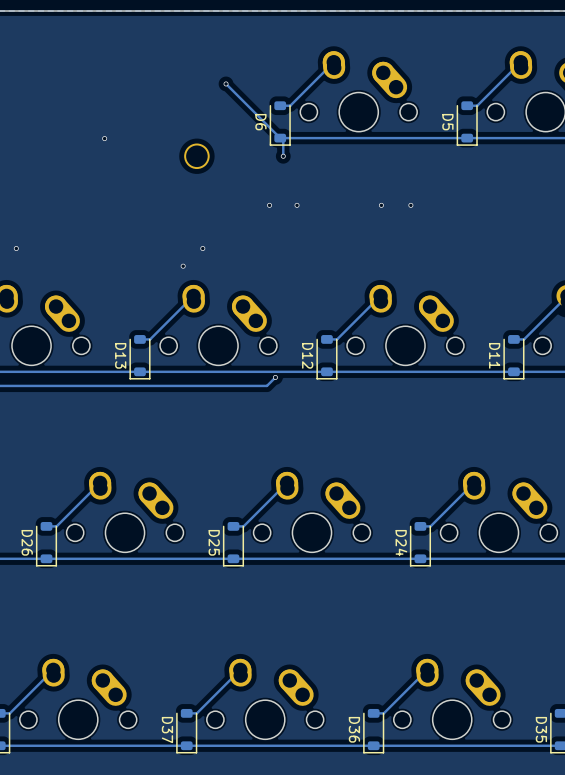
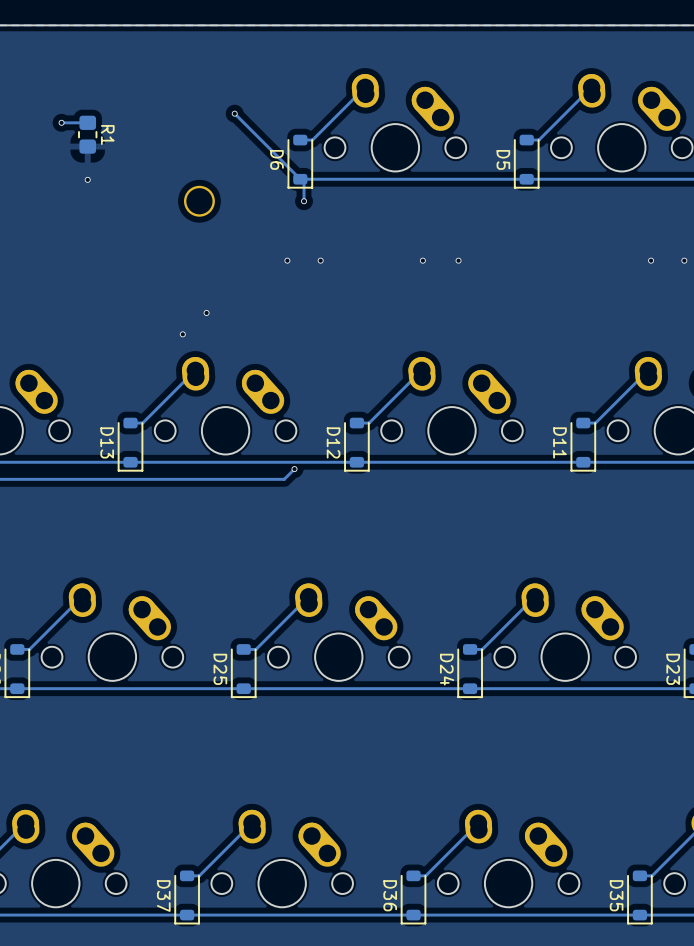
via: none -> (61, 122)
track: none -> (87, 122) (61, 122)
R1: none -> (87, 134)

